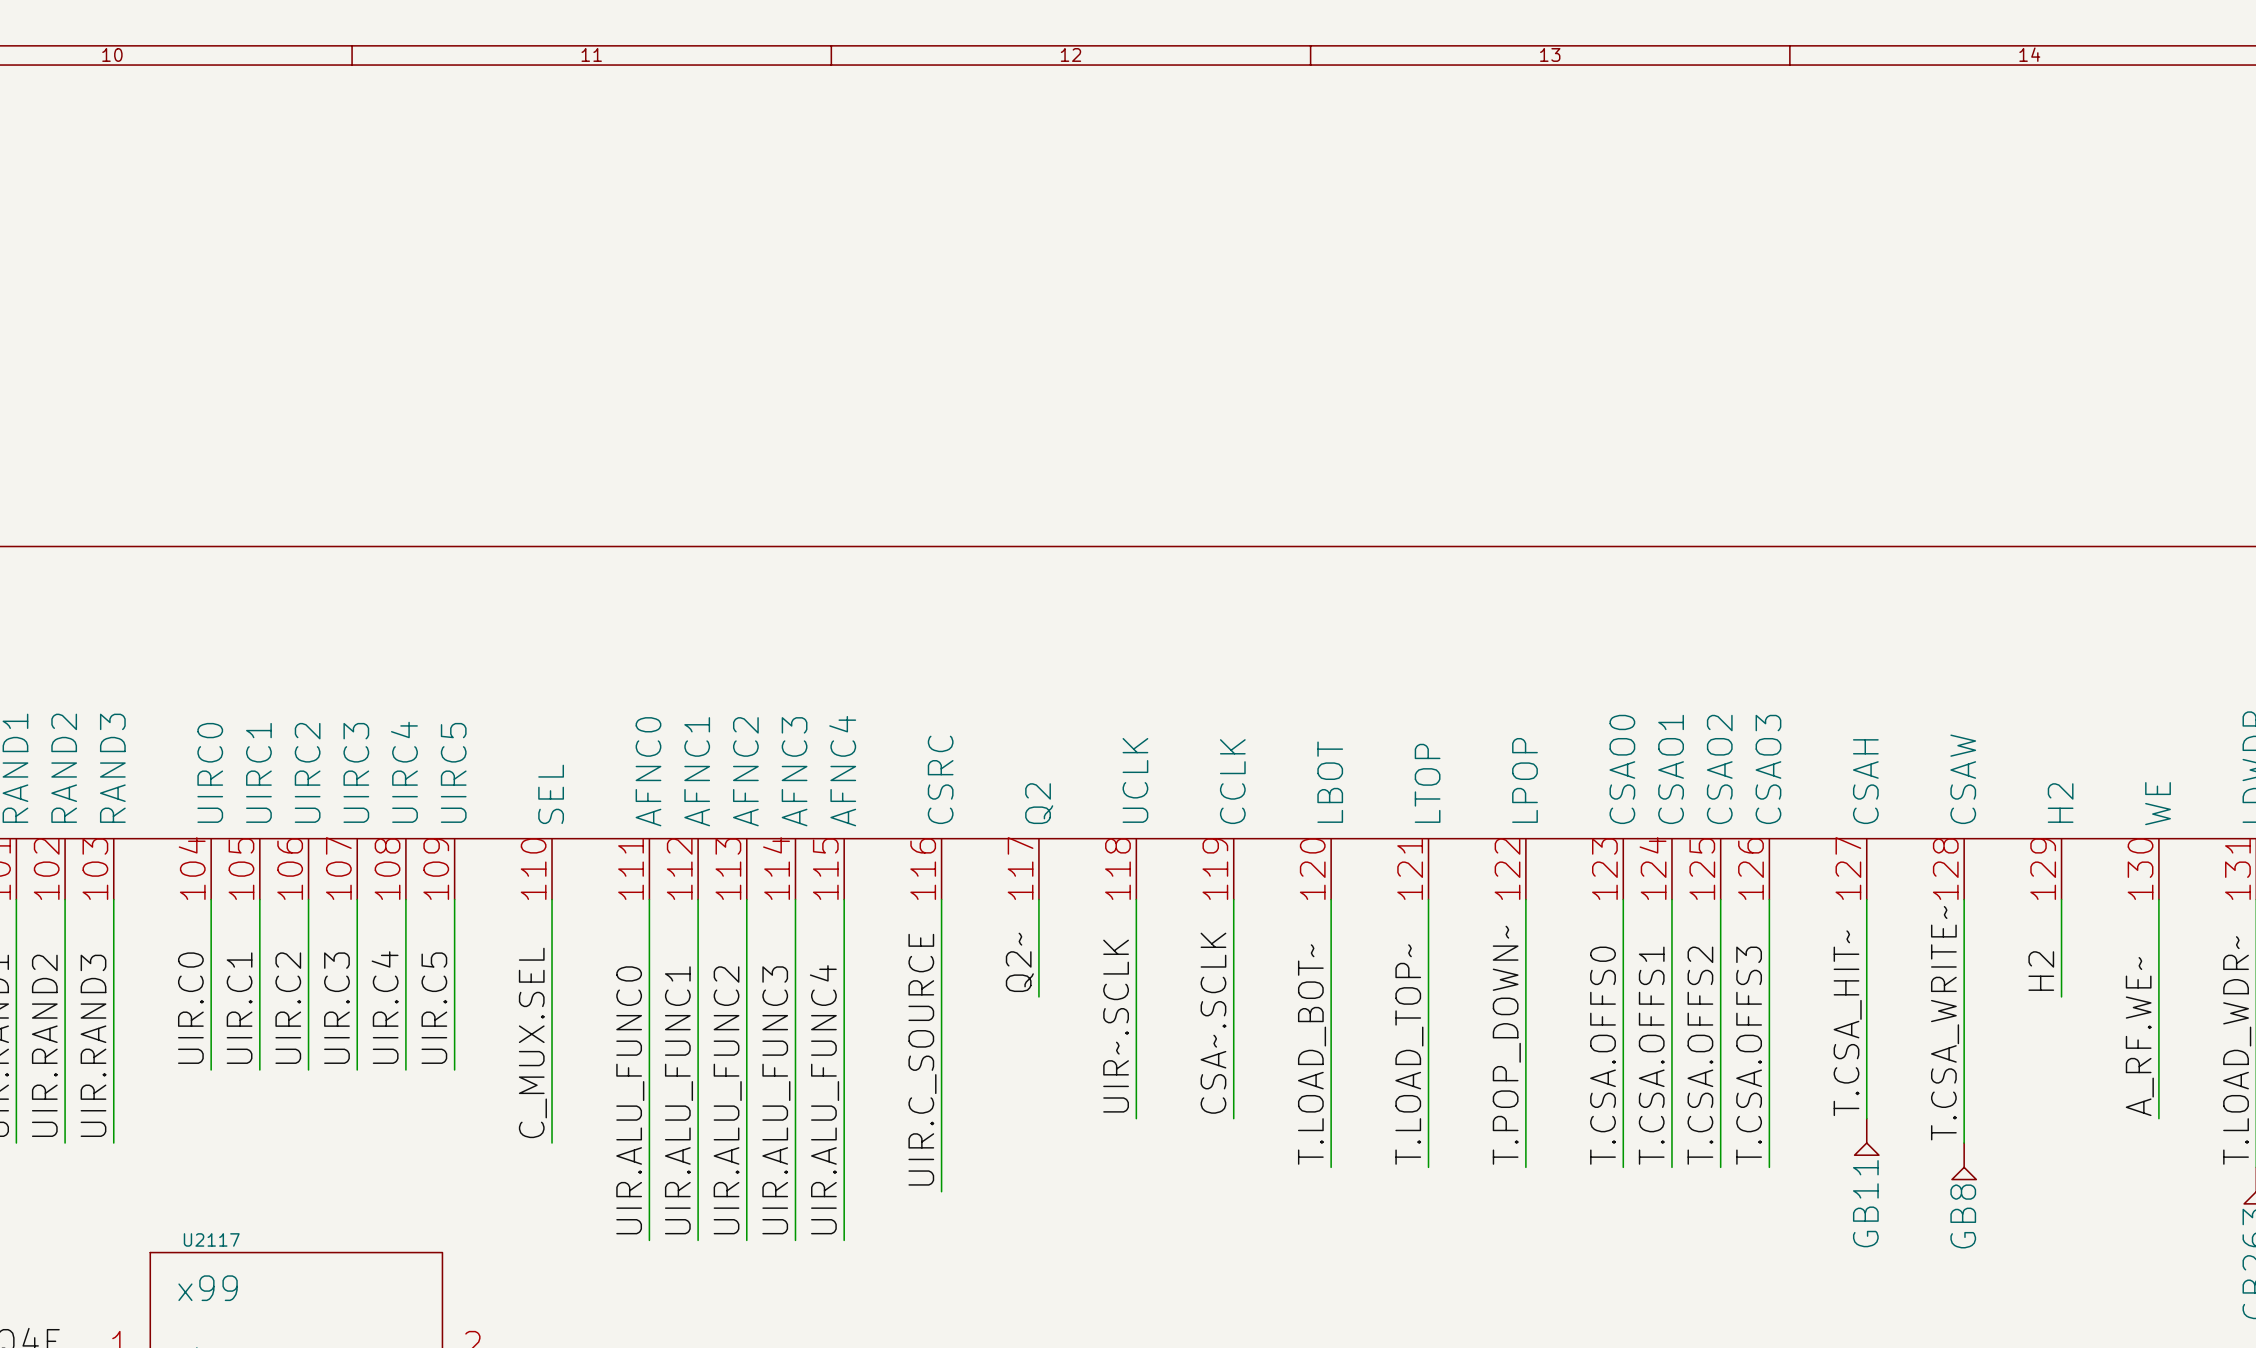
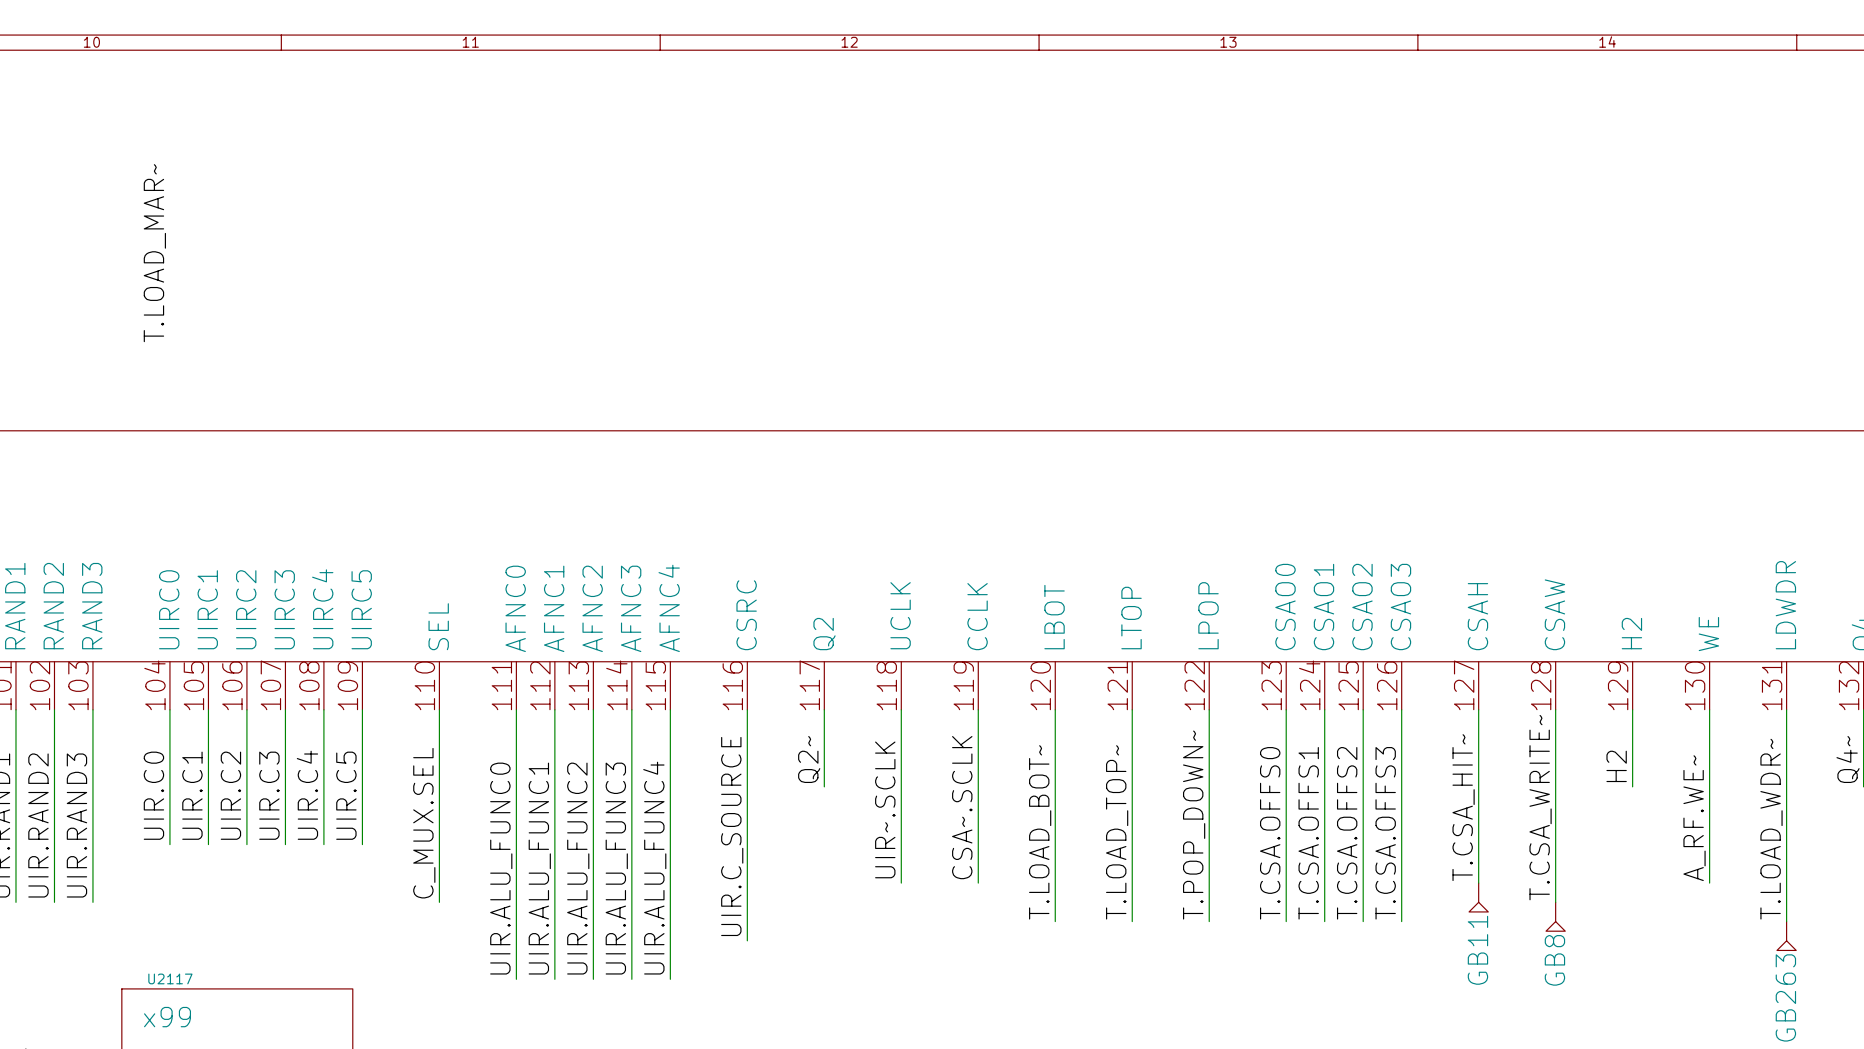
label: none -> T.LOAD_MAR~ (154, 253)

